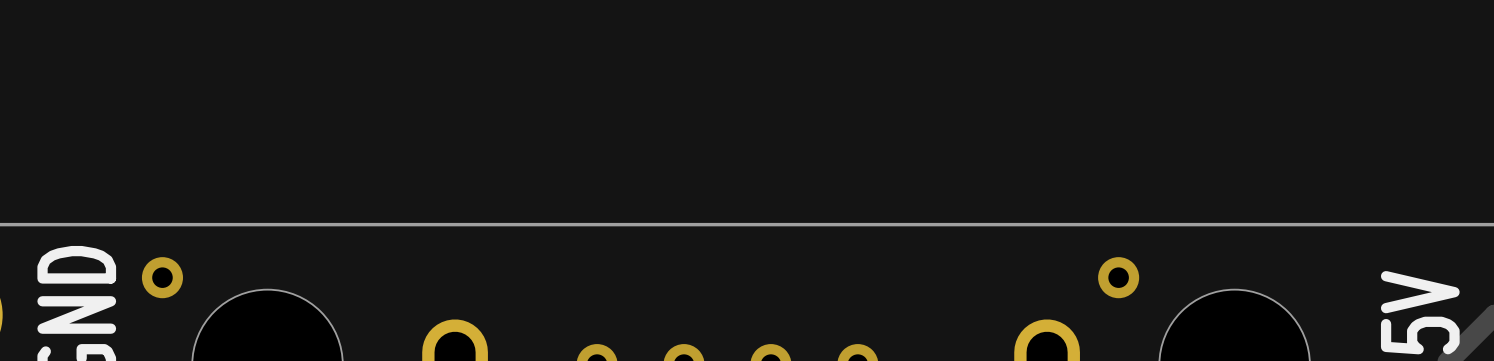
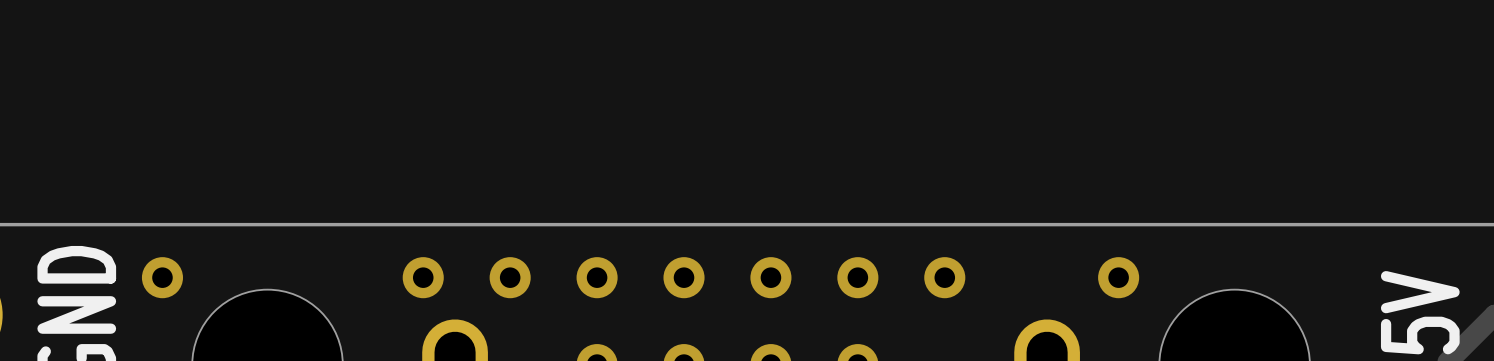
via: none -> (423, 277)
via: none -> (510, 277)
via: none -> (597, 277)
via: none -> (684, 277)
via: none -> (770, 277)
via: none -> (857, 277)
via: none -> (944, 277)

